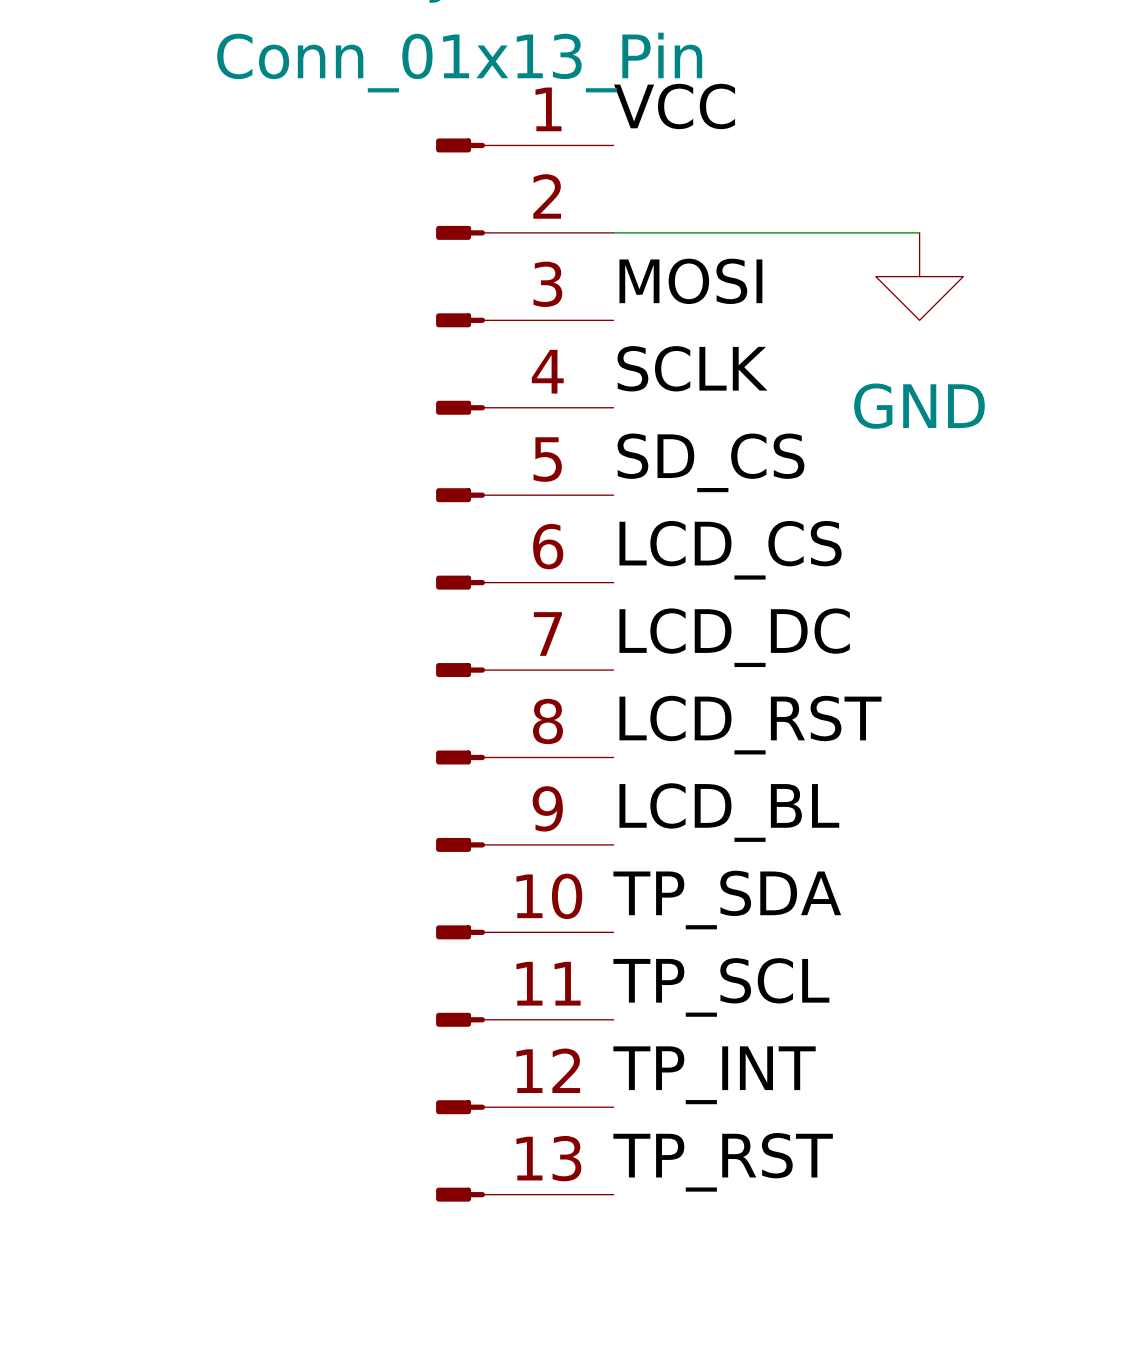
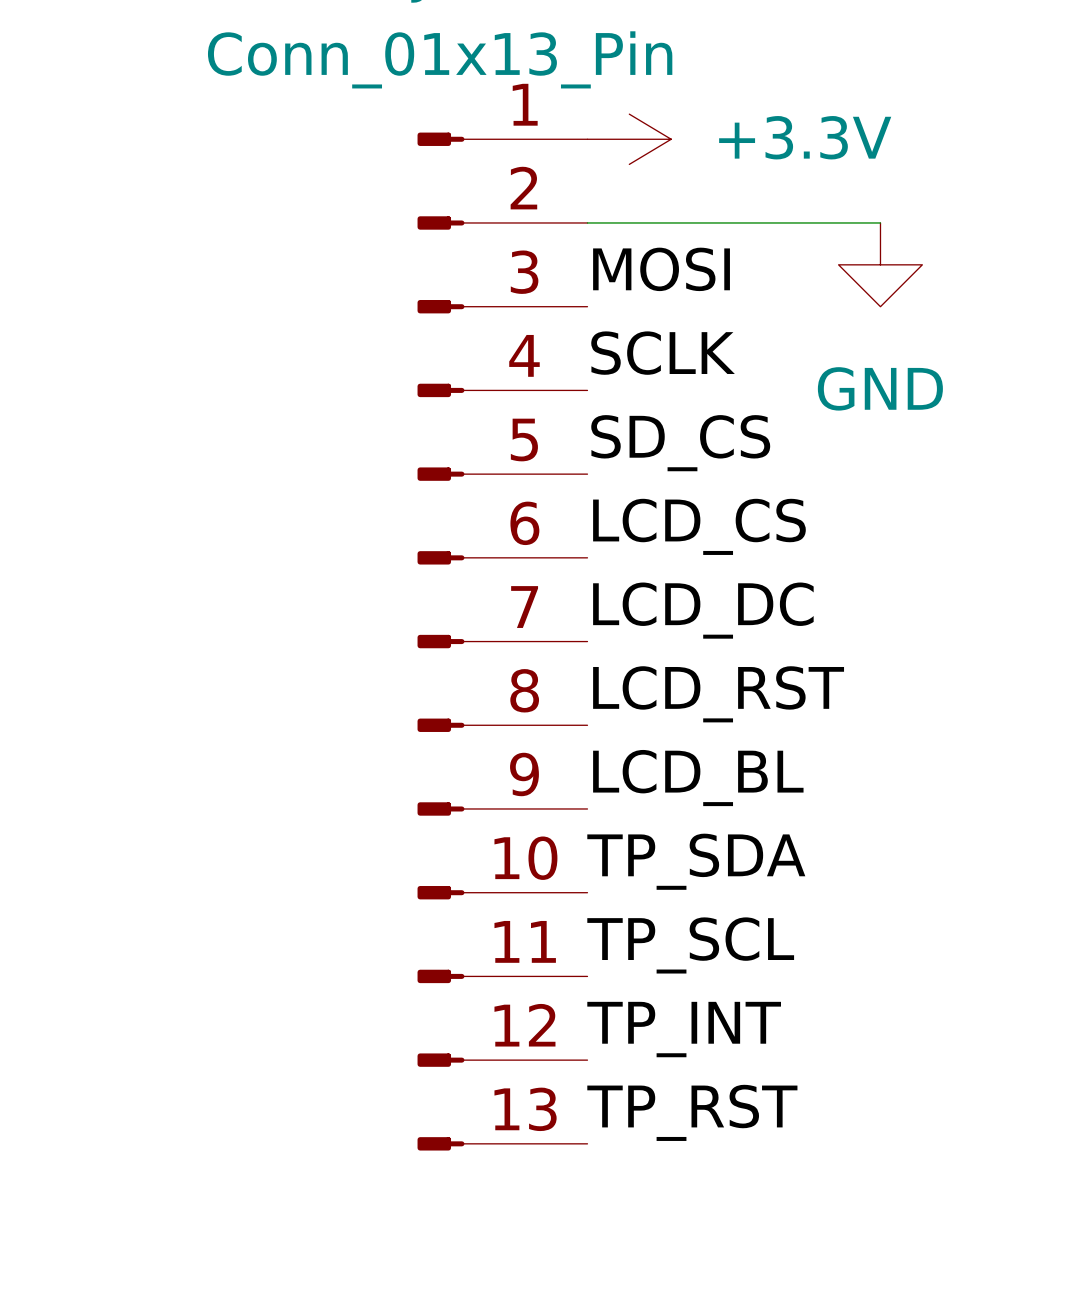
label: VCC (674, 106) -> none
power symbol: none -> +3.3V (629, 139)

